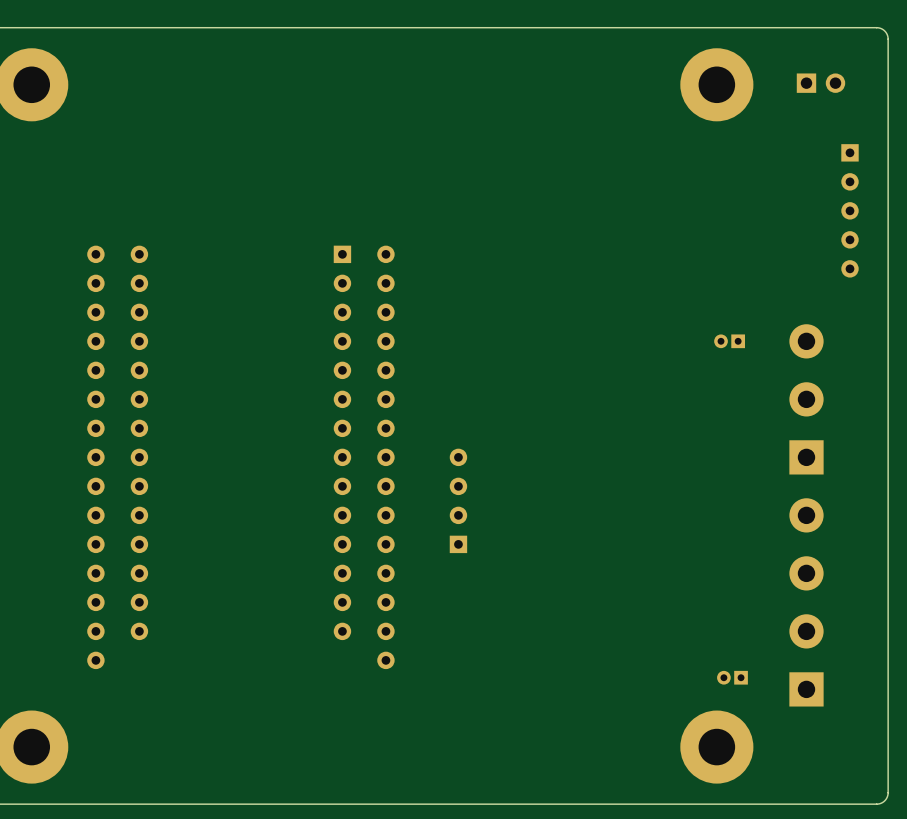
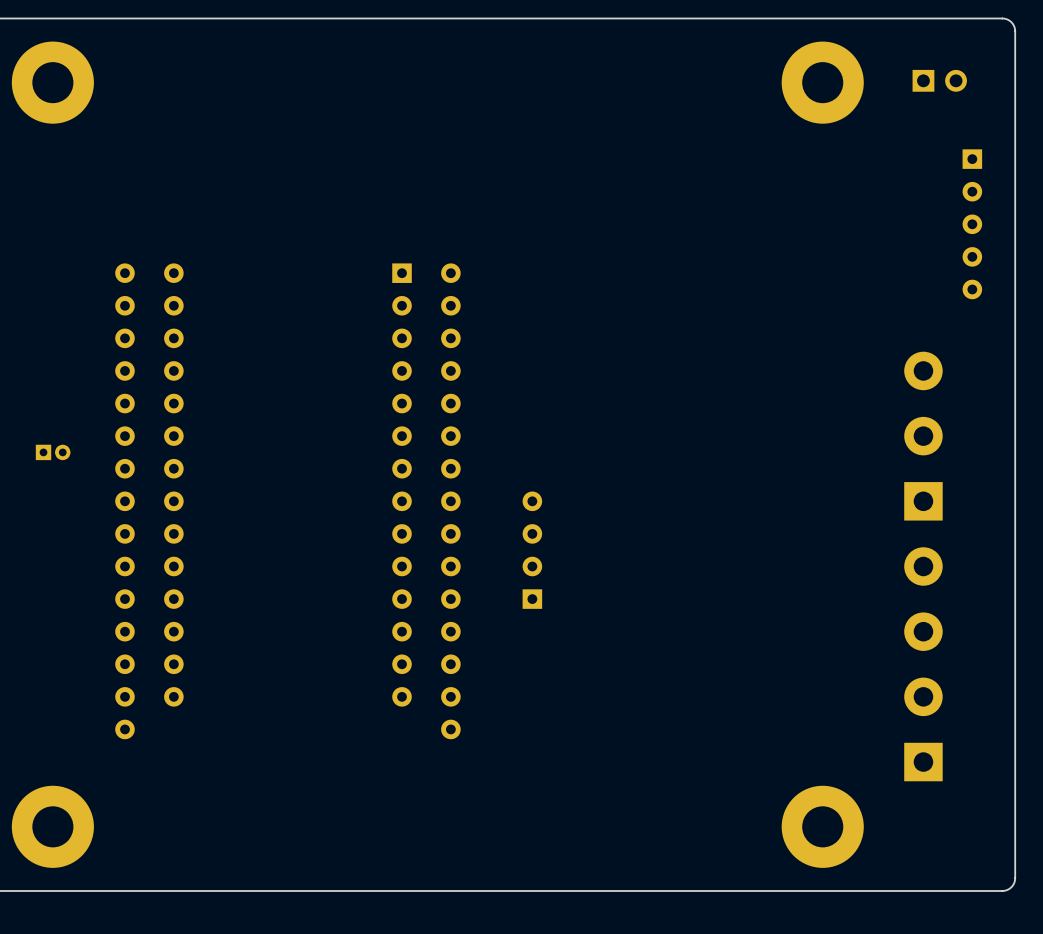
part: (729, 341) -> none
part: none -> (53, 452)
part: (732, 677) -> none

